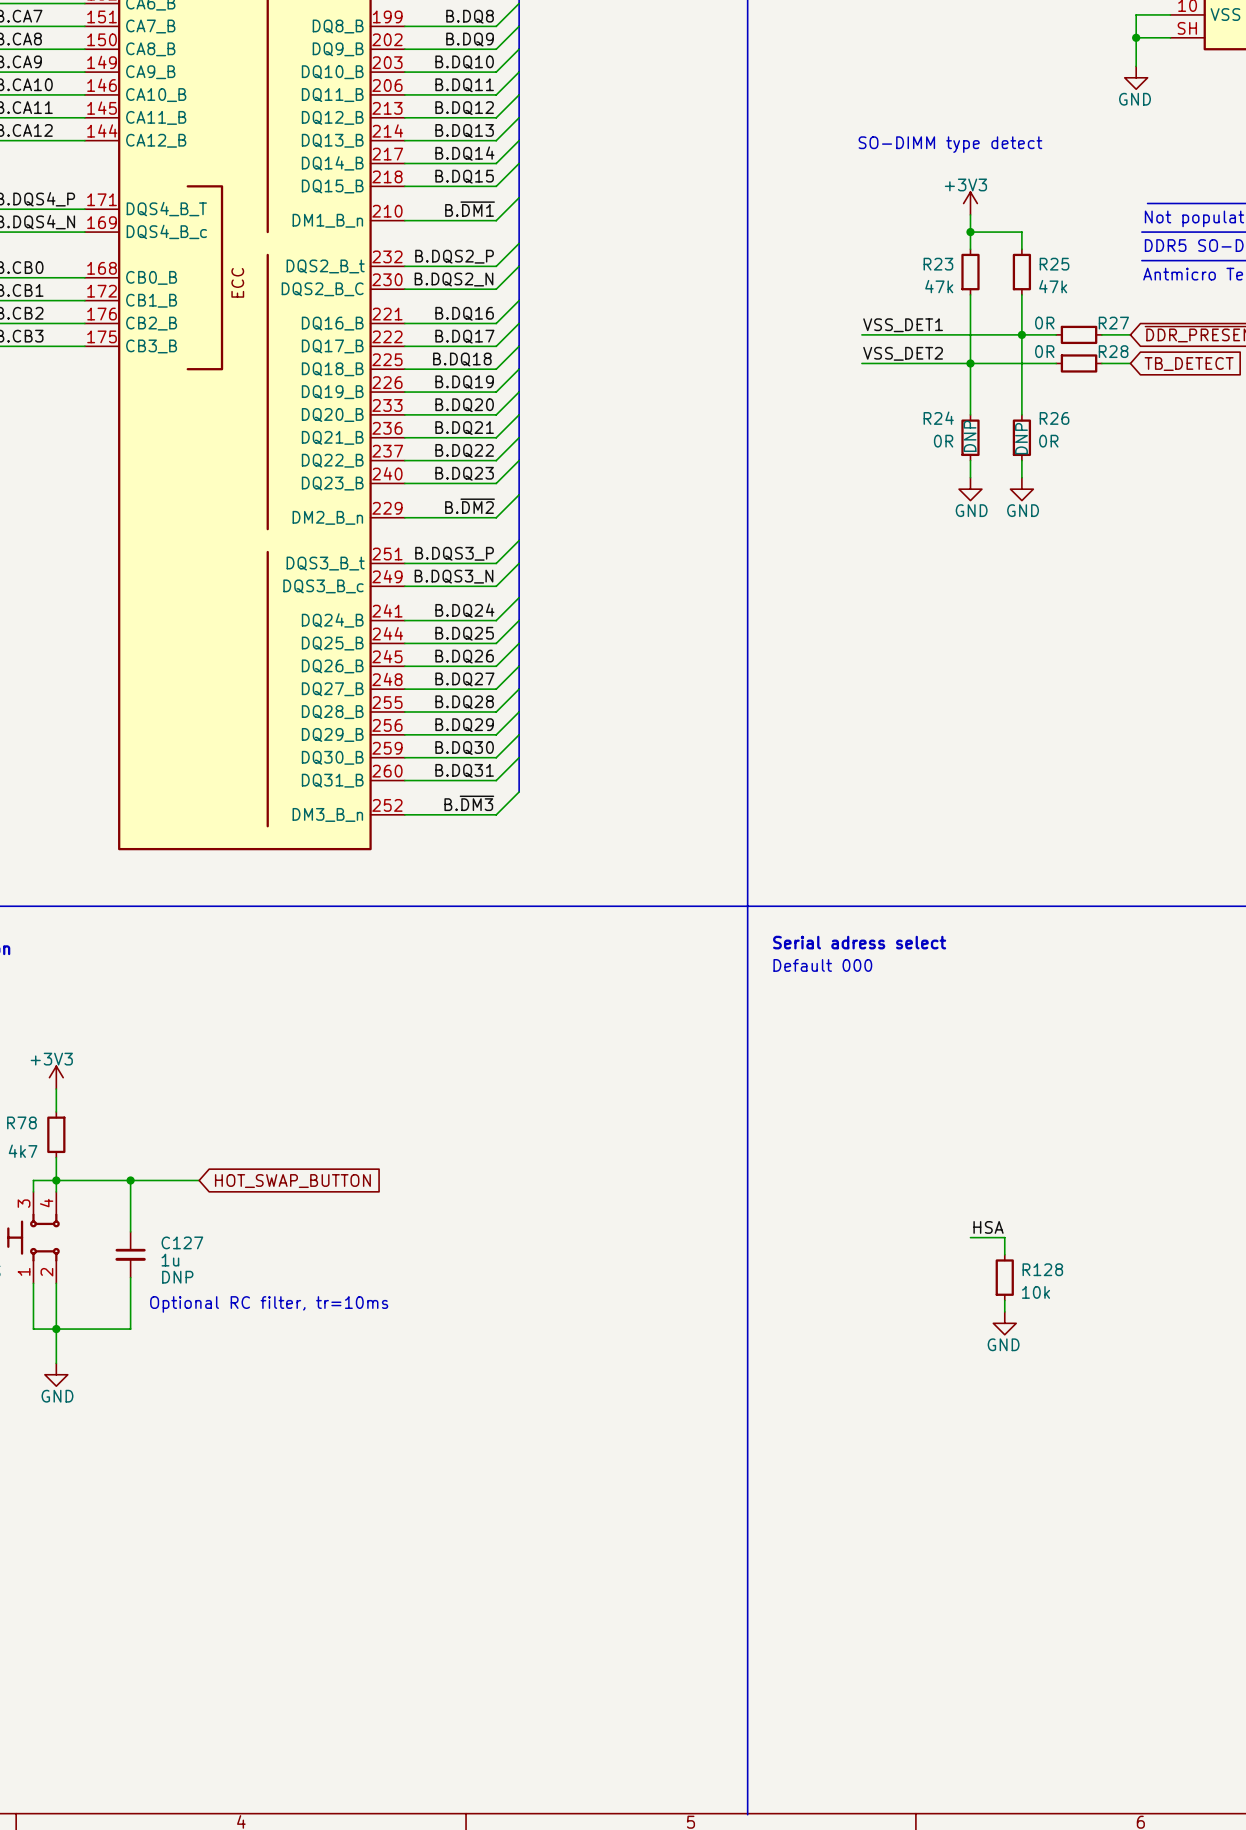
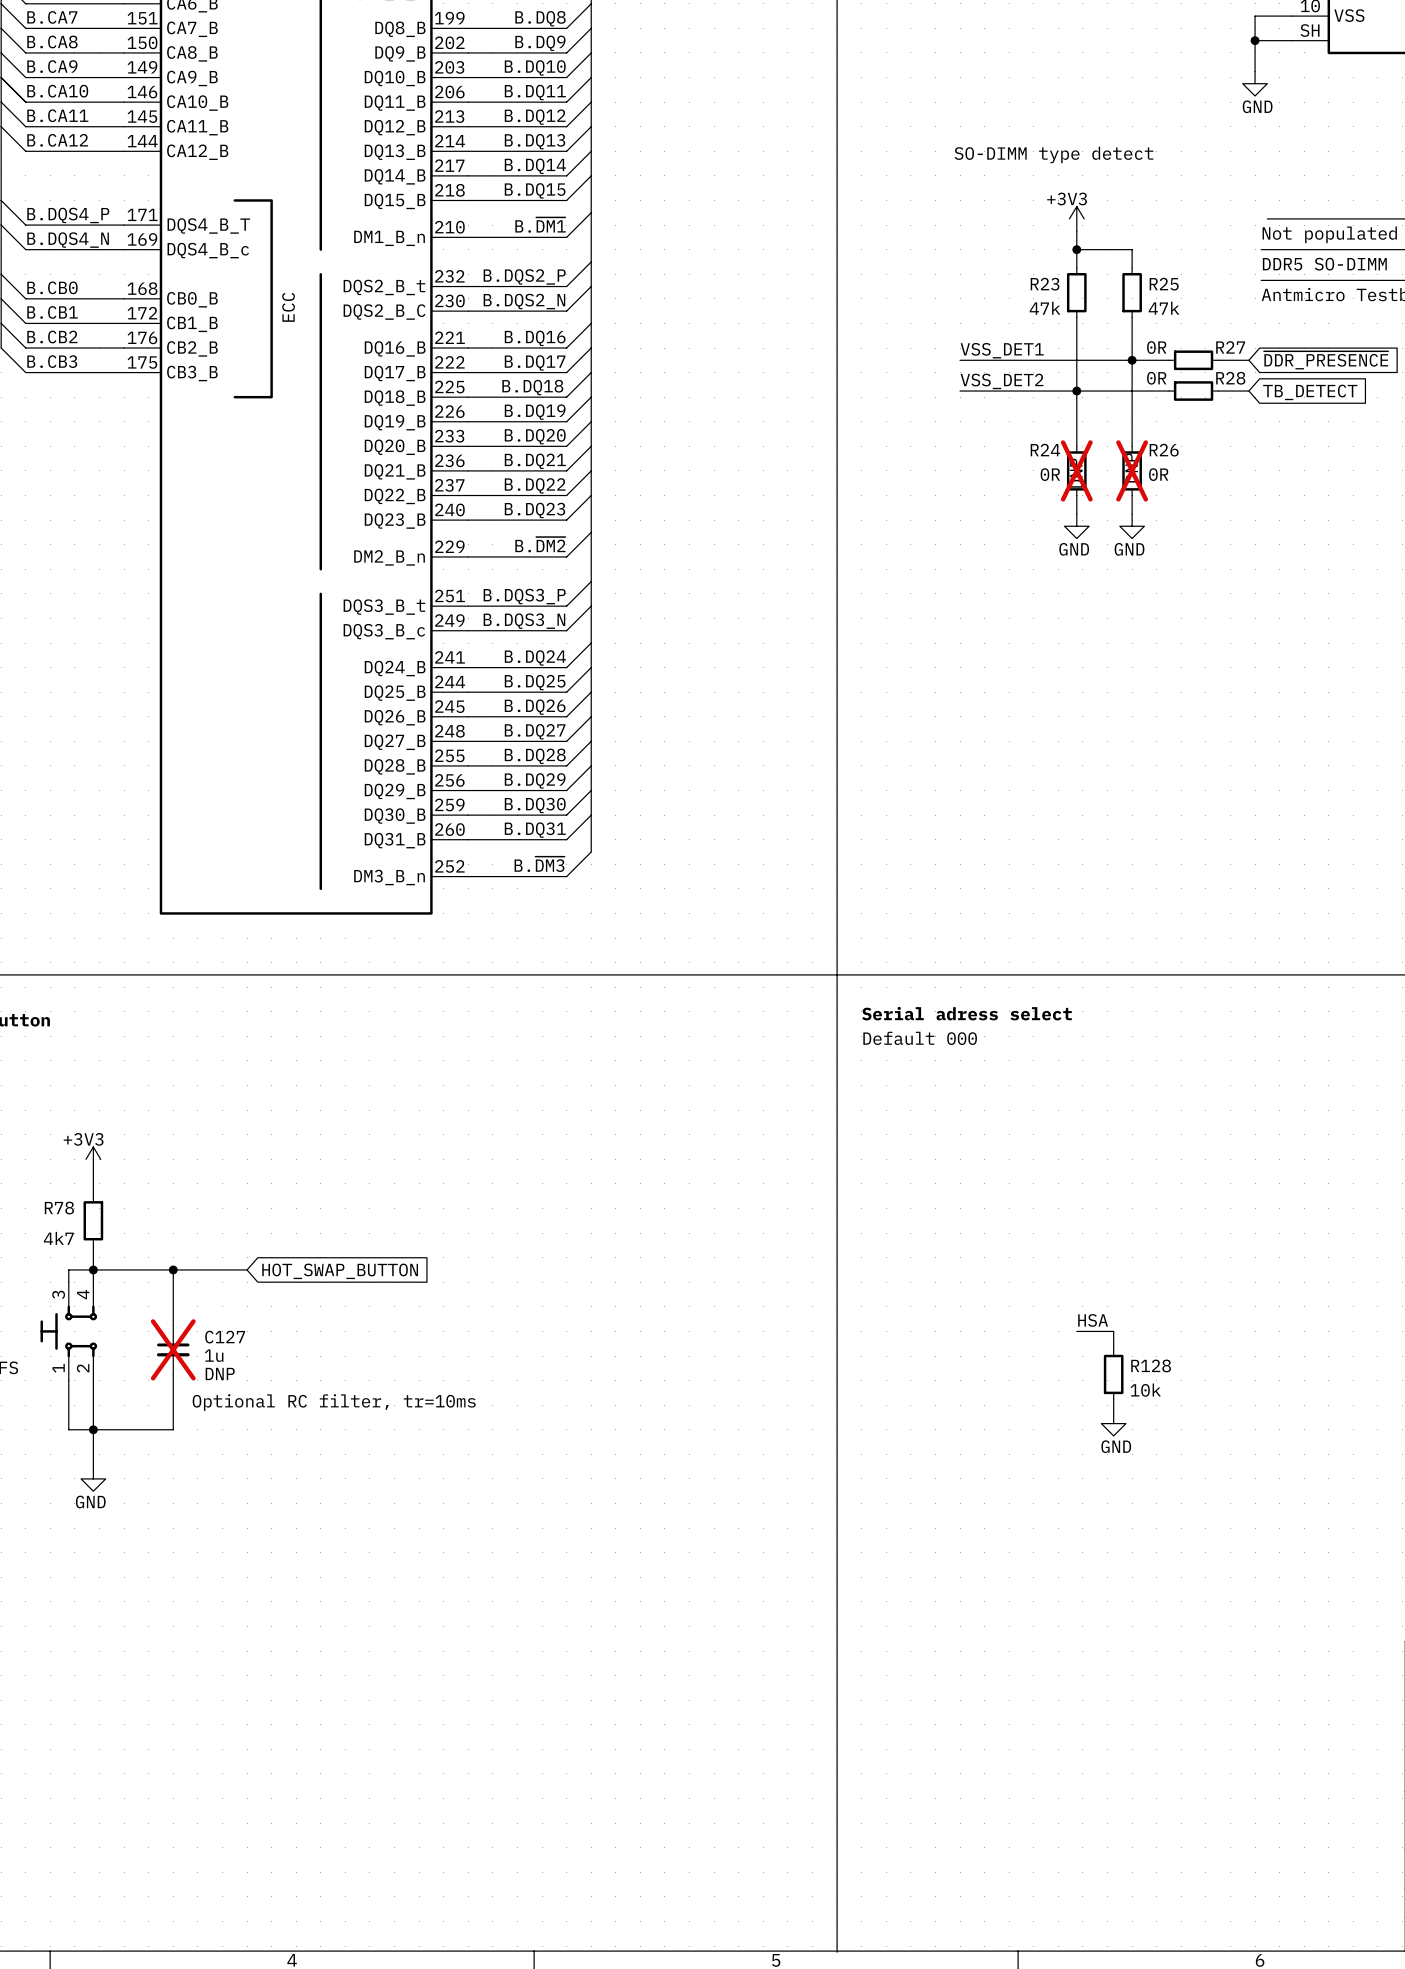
R24 do-not-place cross: none -> (1076, 470)
R26 do-not-place cross: none -> (1132, 470)
C127 do-not-place cross: none -> (173, 1349)

